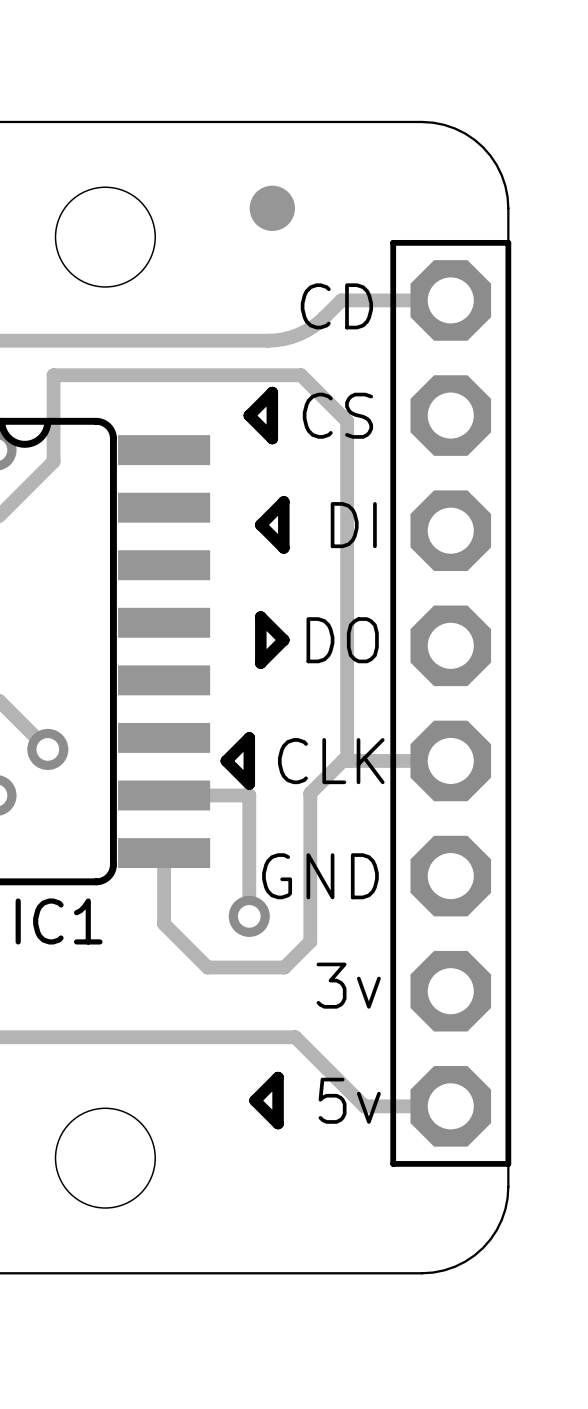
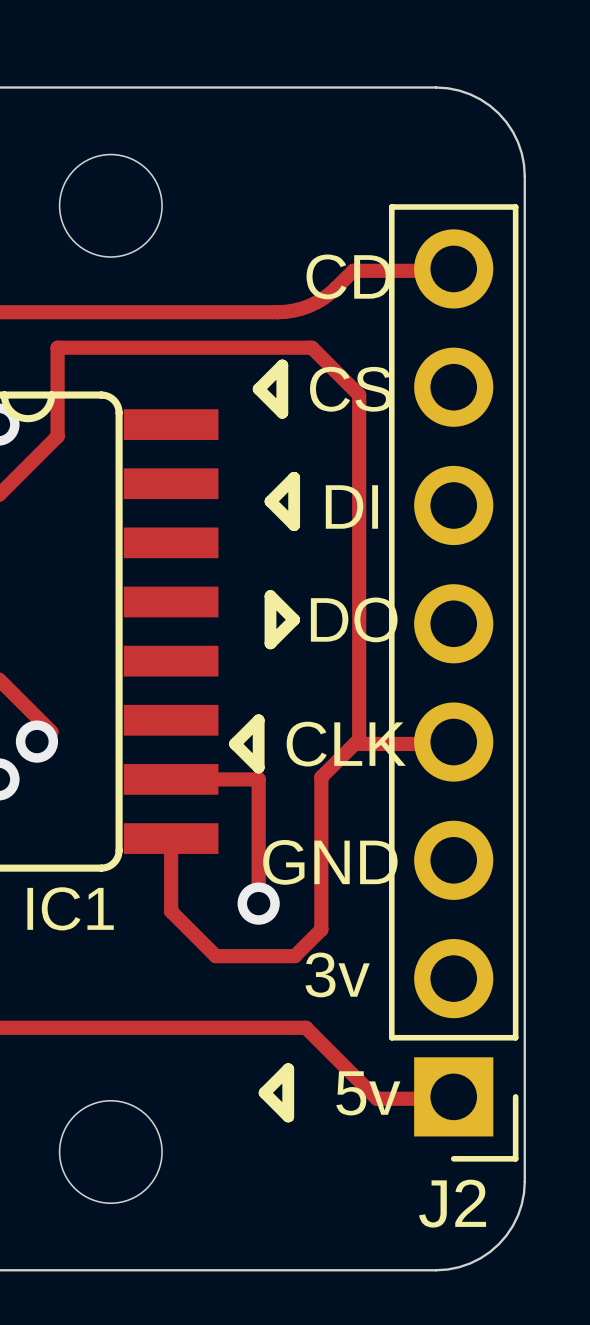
part: (272, 208) -> none
text position: DI (353, 525) -> DI (351, 506)
J2: none -> (453, 682)
part: (450, 703) -> none
via position: (47, 749) -> (36, 741)
text position: 3v (348, 985) -> 3v (337, 974)

